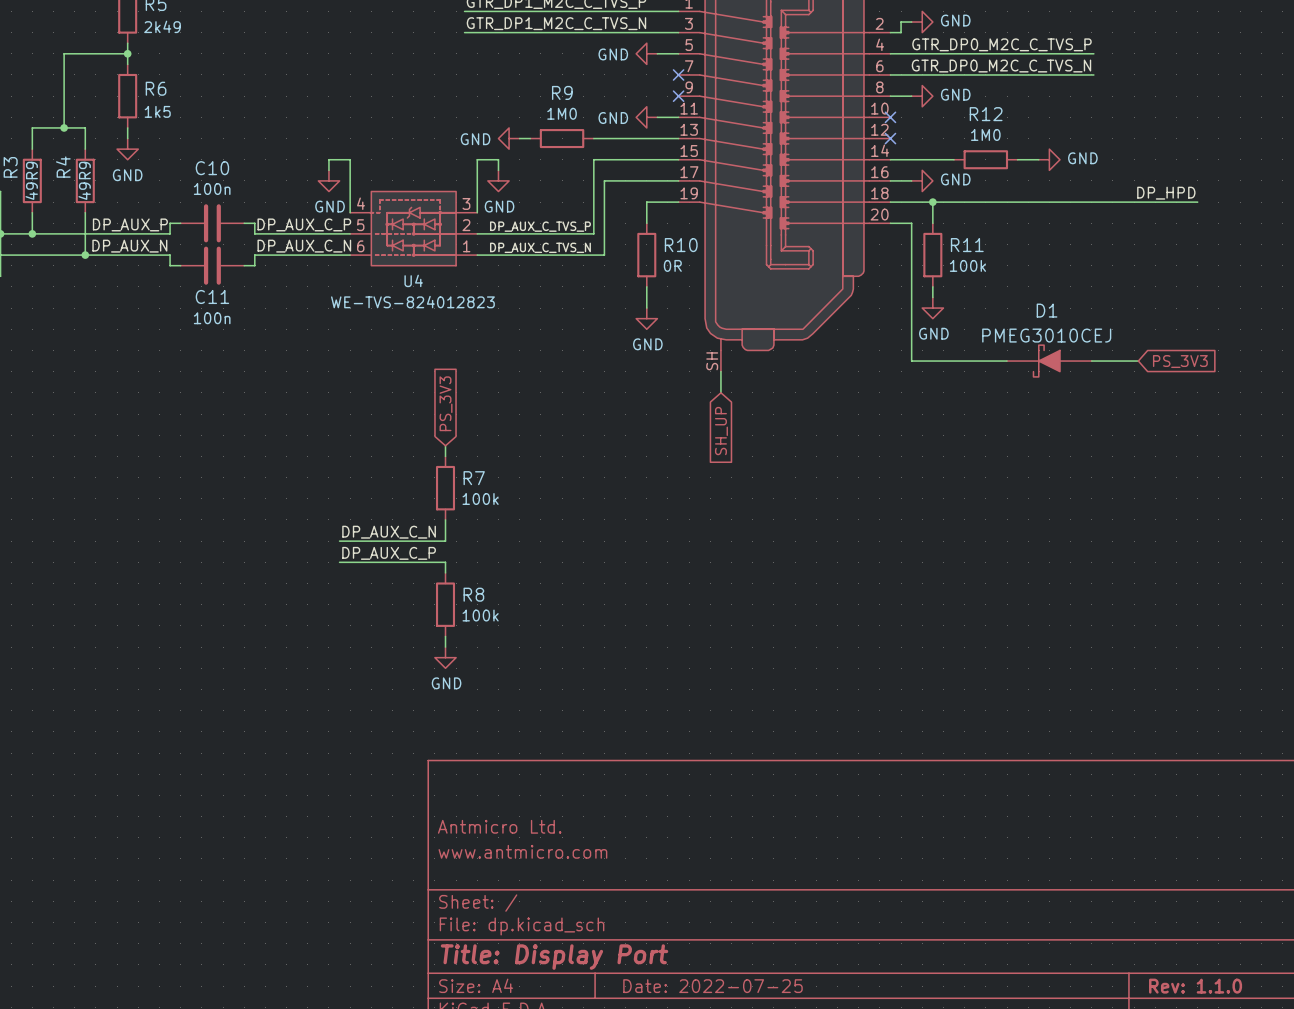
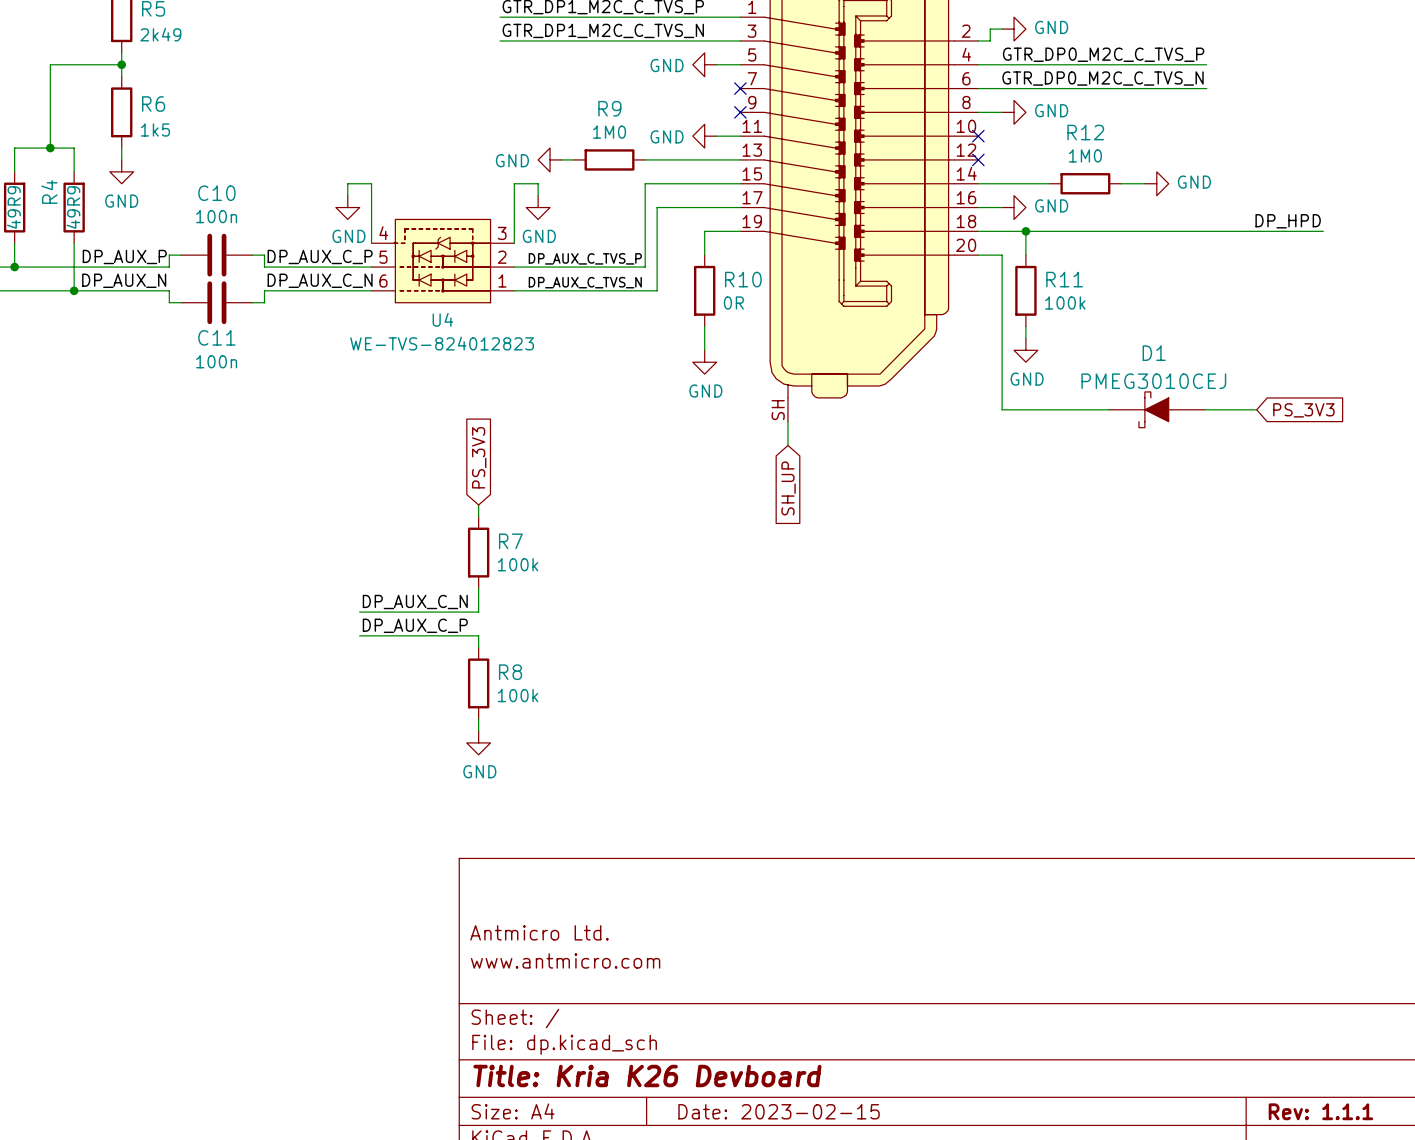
title block: Title: Display Port (554, 957) -> Title: Kria K26 Devboard (647, 1076)
title block: Date: 2022-07-25 (712, 986) -> Date: 2023-02-15 (779, 1111)
title block: Rev: 1.1.0 (1195, 986) -> Rev: 1.1.1 (1320, 1111)

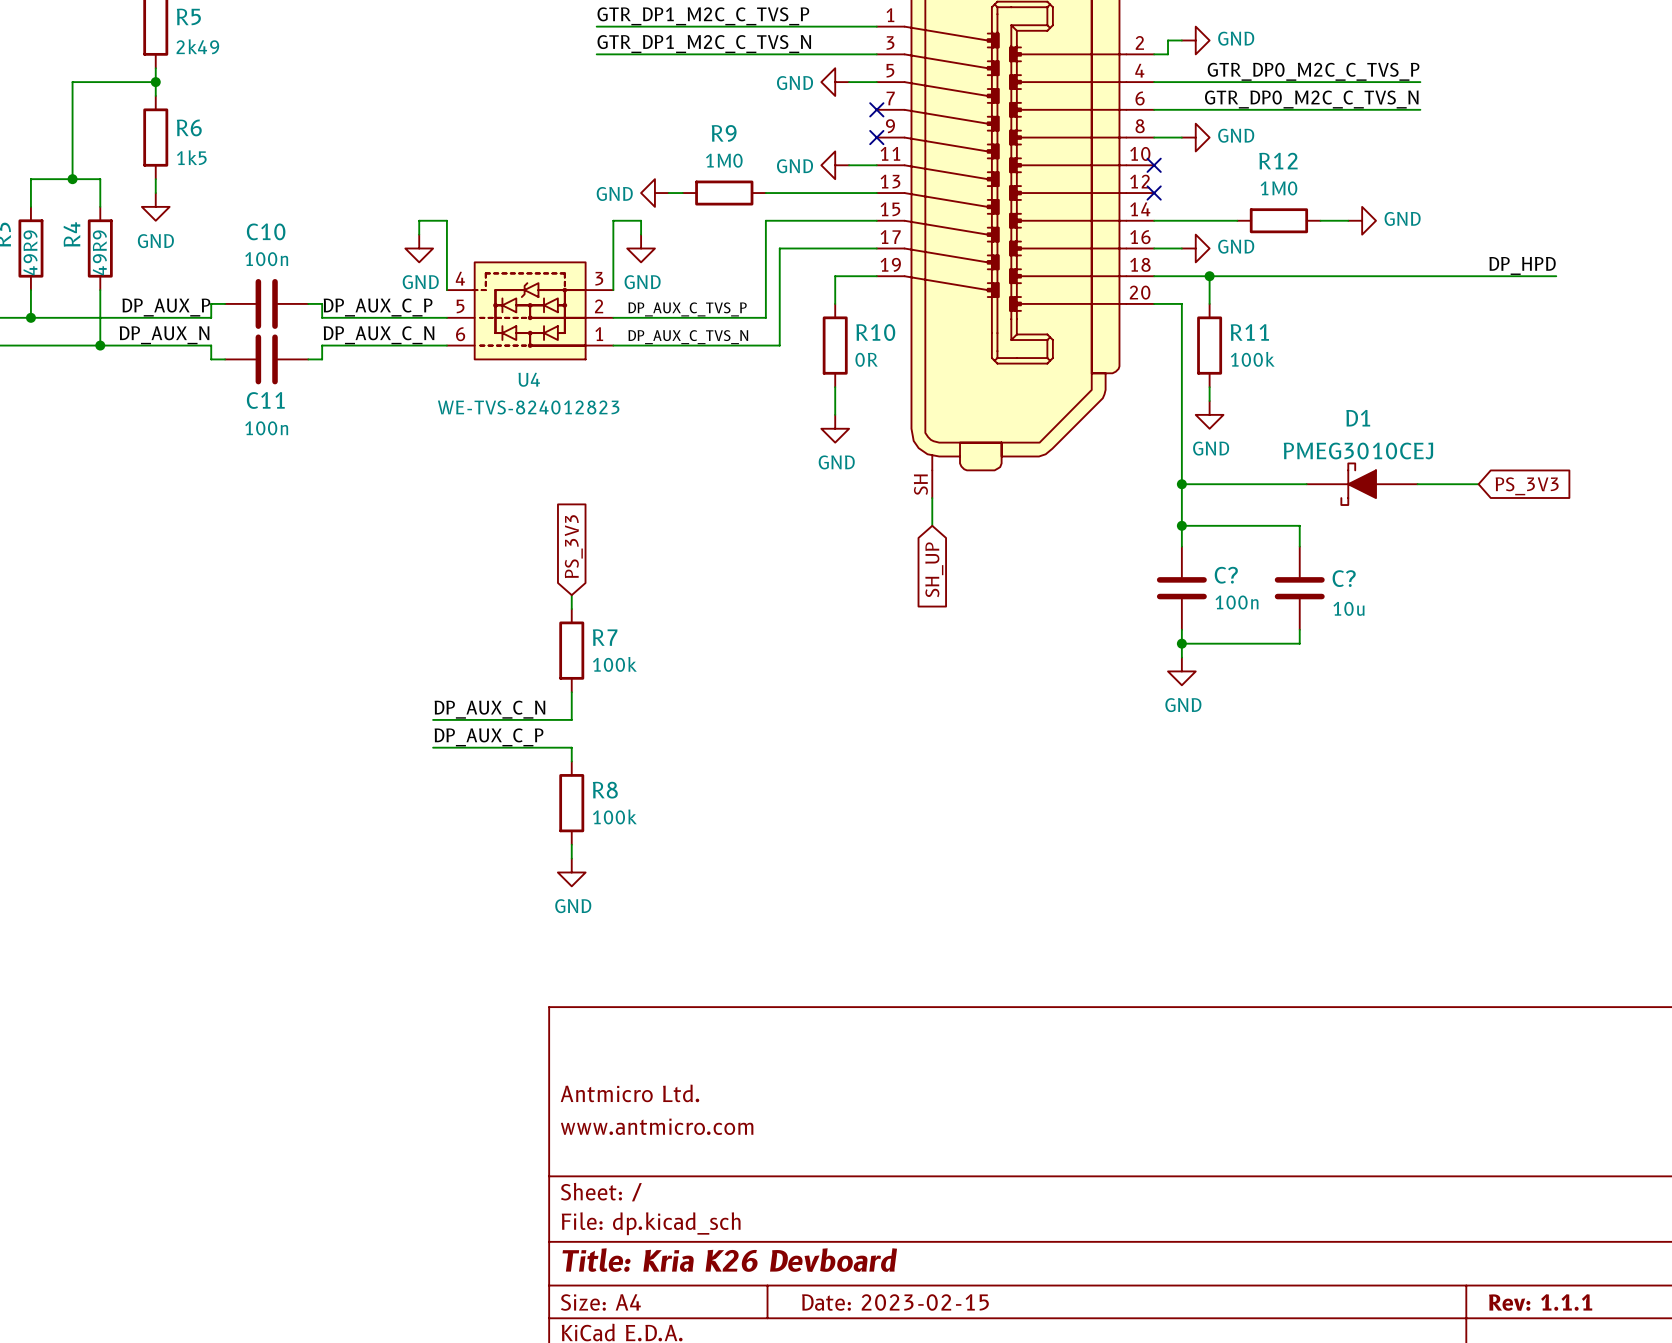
wire: none -> (1181, 484) (1181, 546)
junction: none -> (1181, 484)
wire: none -> (1181, 525) (1299, 525) (1299, 546)
junction: none -> (1181, 525)
C?: none -> (1181, 588)
C?: none -> (1299, 588)
wire: none -> (1181, 629) (1181, 657)
wire: none -> (1299, 629) (1299, 643) (1181, 643)
junction: none -> (1181, 643)
power symbol: none -> GND (1181, 671)

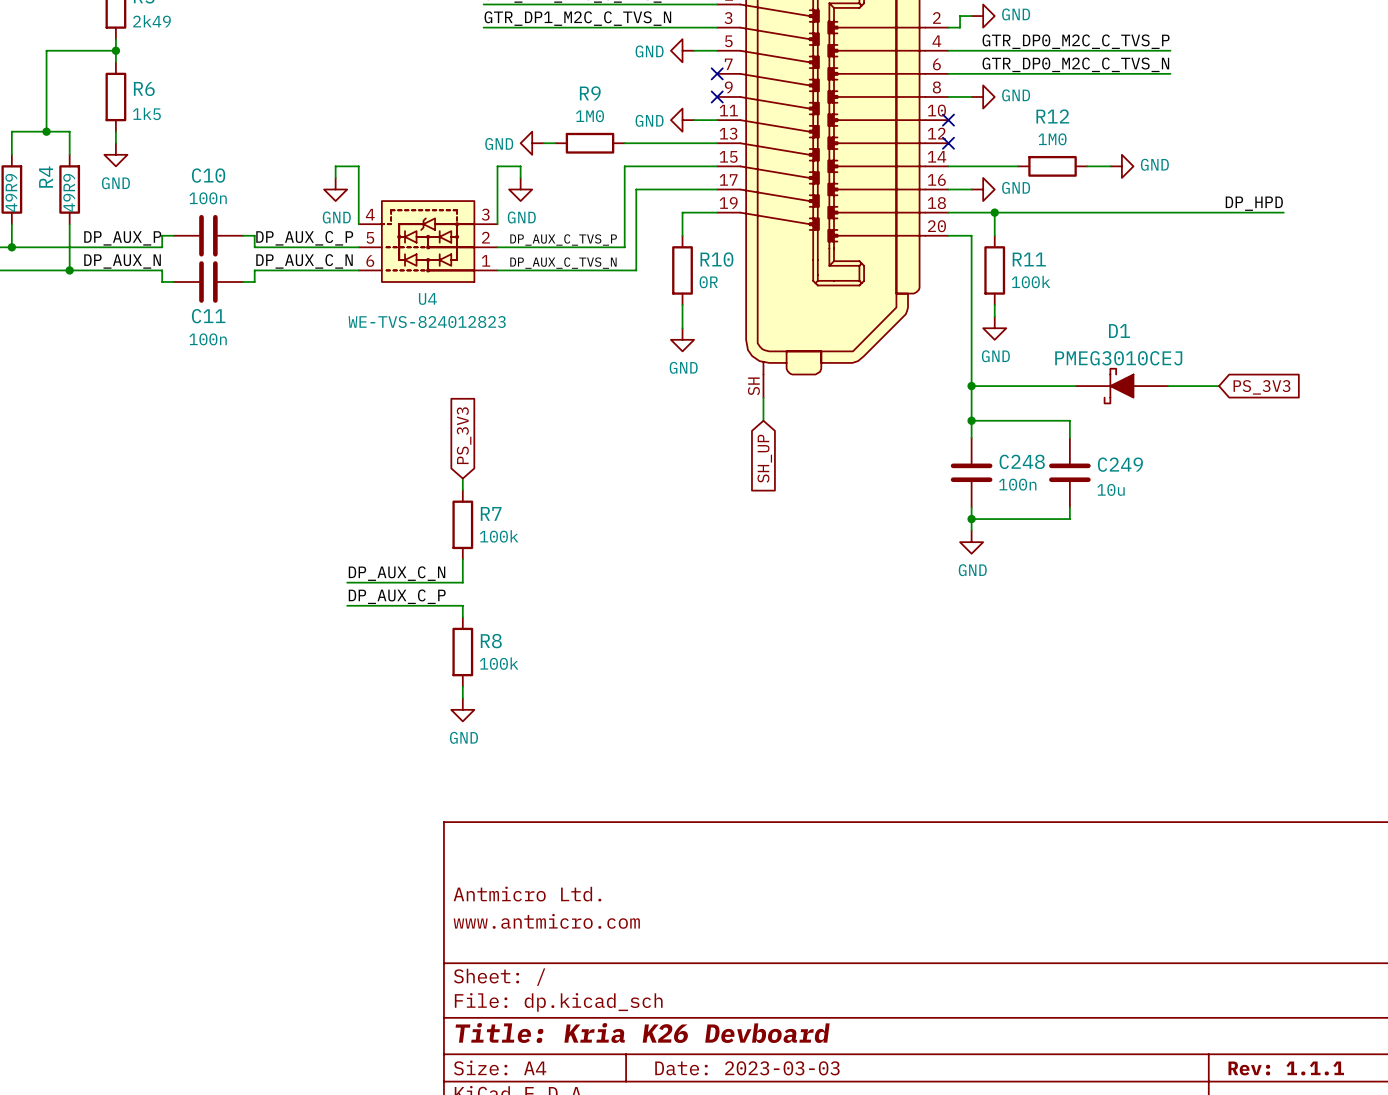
C? name: C? (1226, 575) -> C248 (1022, 461)
C? name: C? (1344, 578) -> C249 (1120, 464)
title block: Date: 2023-02-15 (895, 1302) -> Date: 2023-03-03 (747, 1068)

